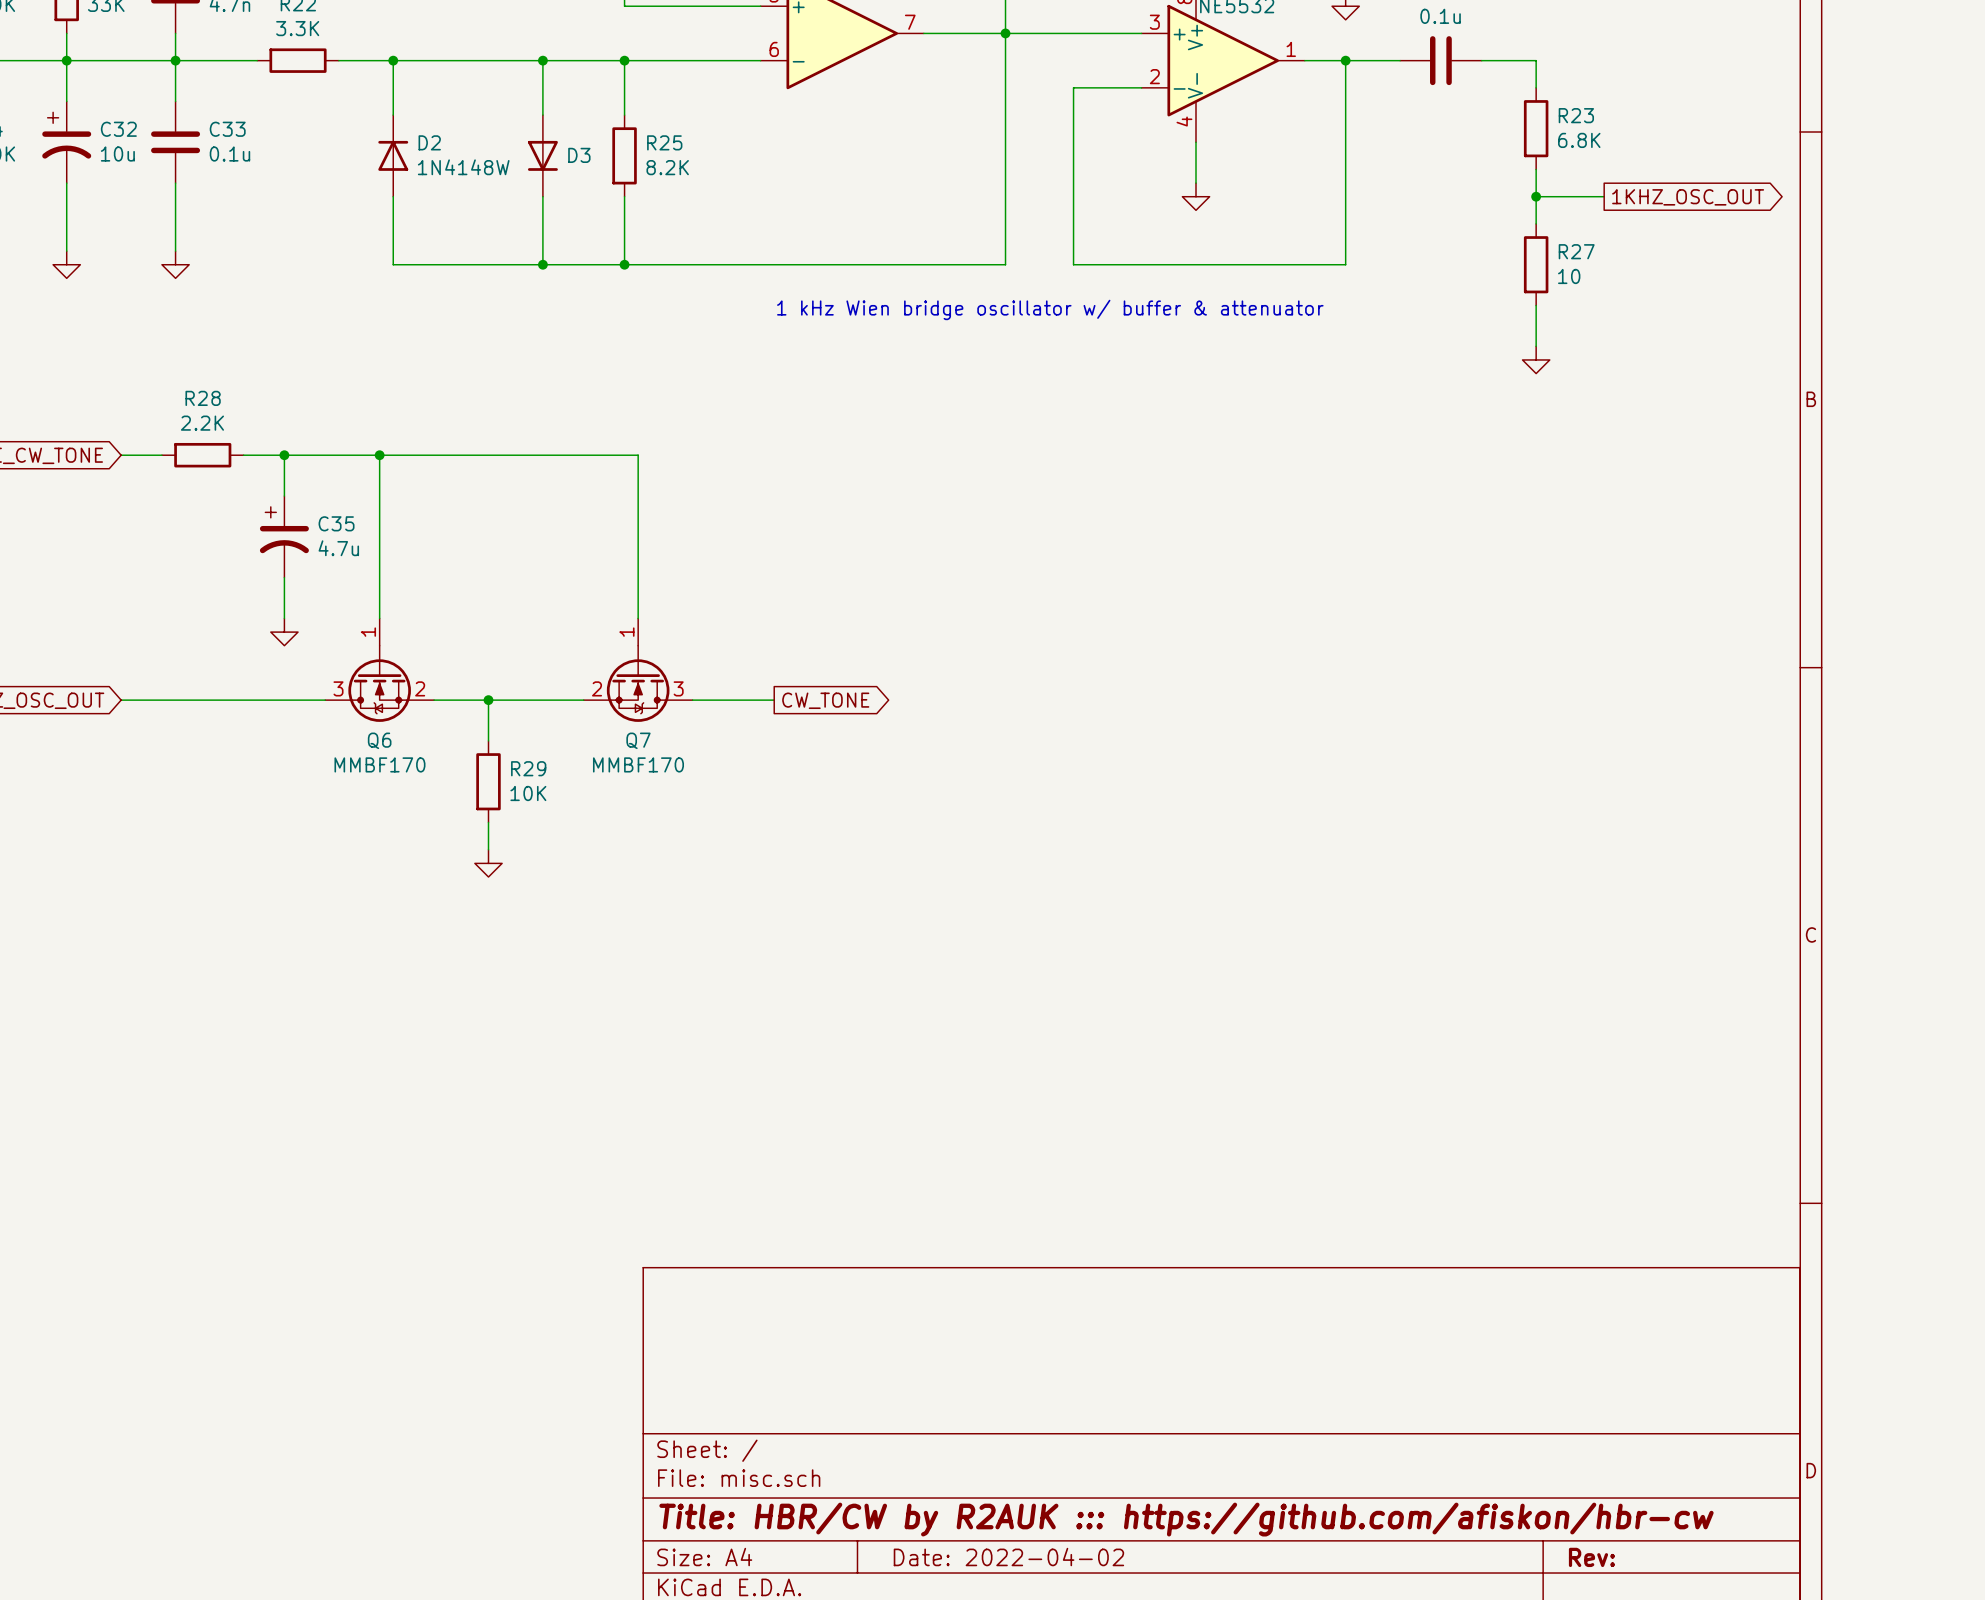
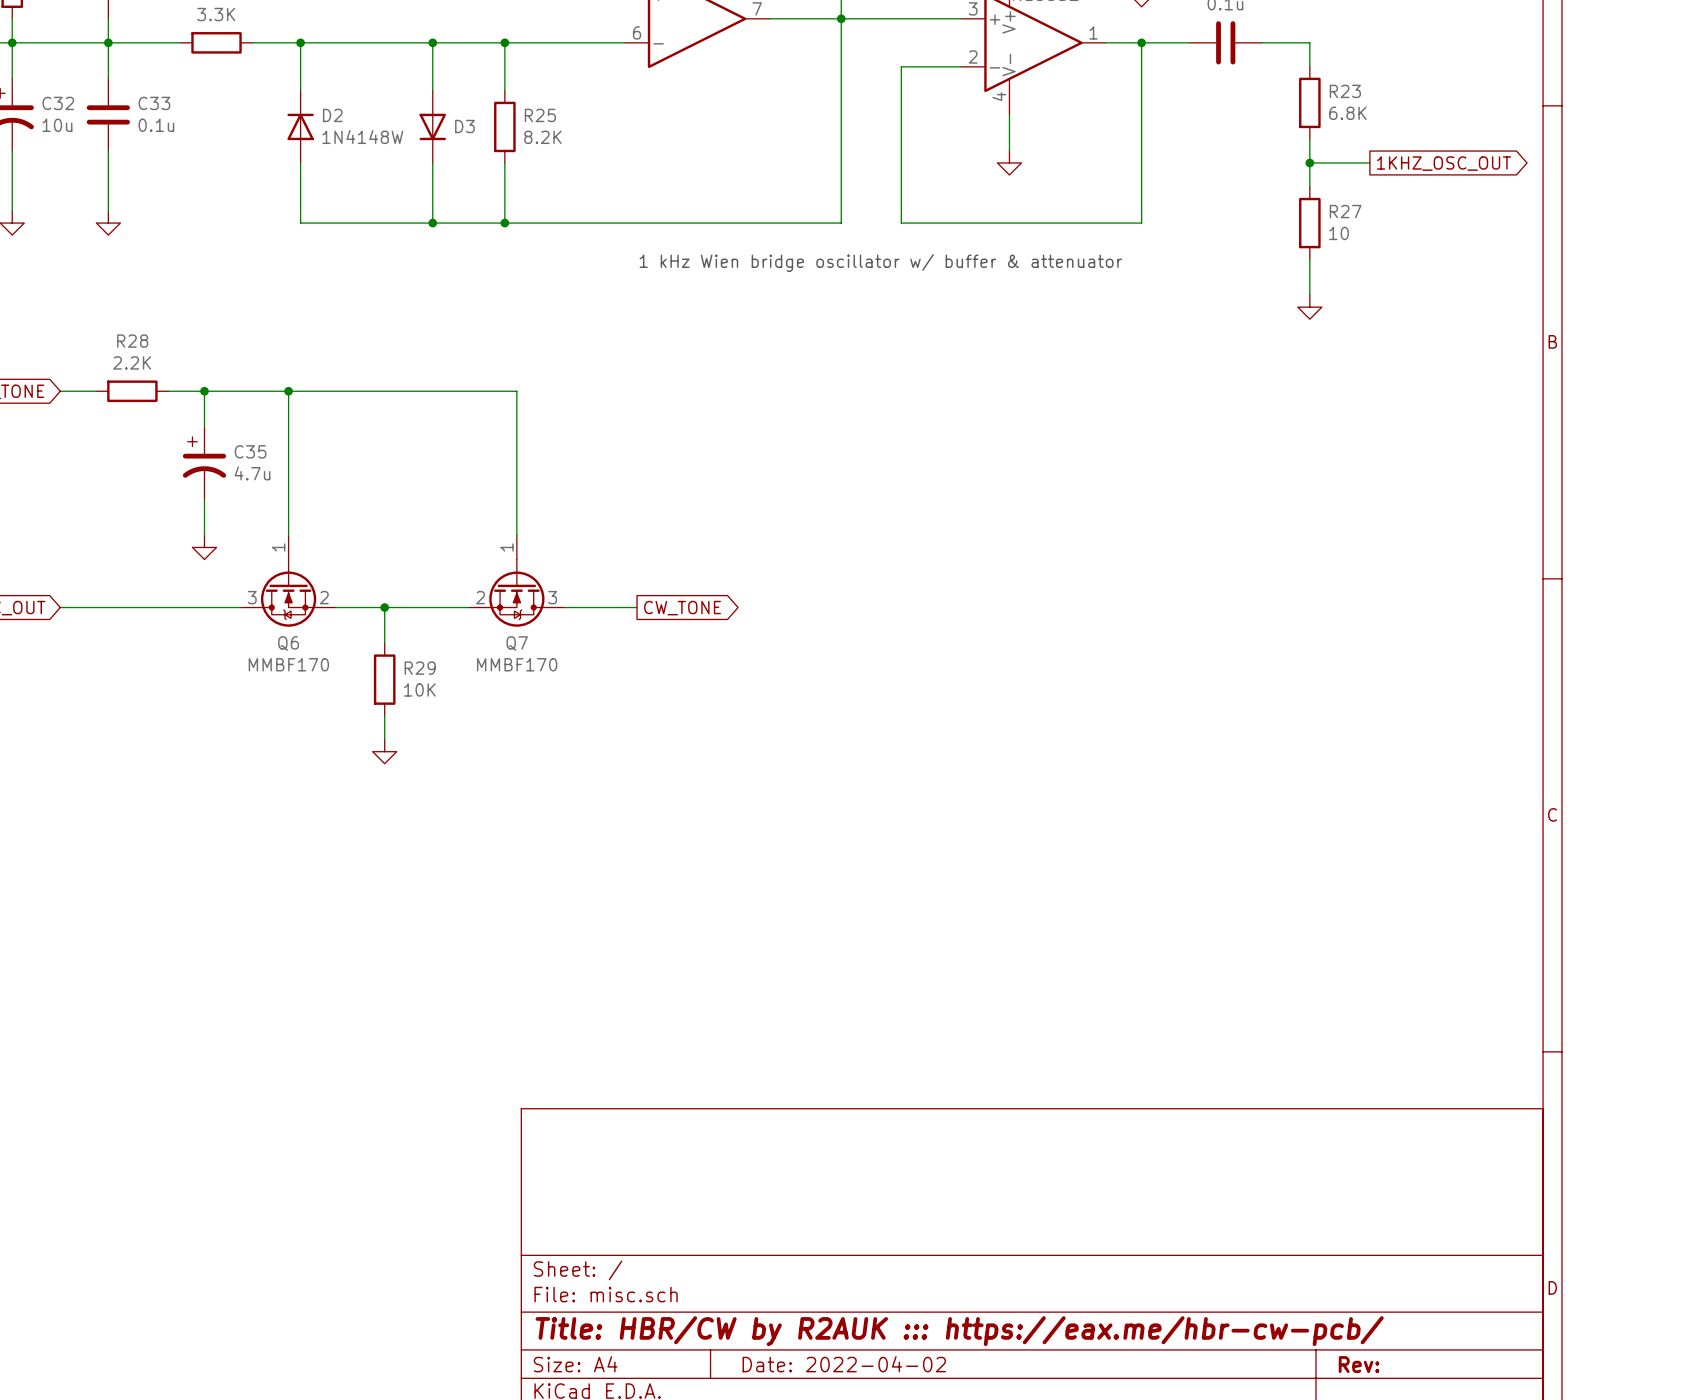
title block: Title: HBR/CW by R2AUK ::: https://github.com/afiskon/hbr-cw (1186, 1519) -> Title: HBR/CW by R2AUK ::: https://eax.me/hbr-cw-pcb/ (959, 1331)

